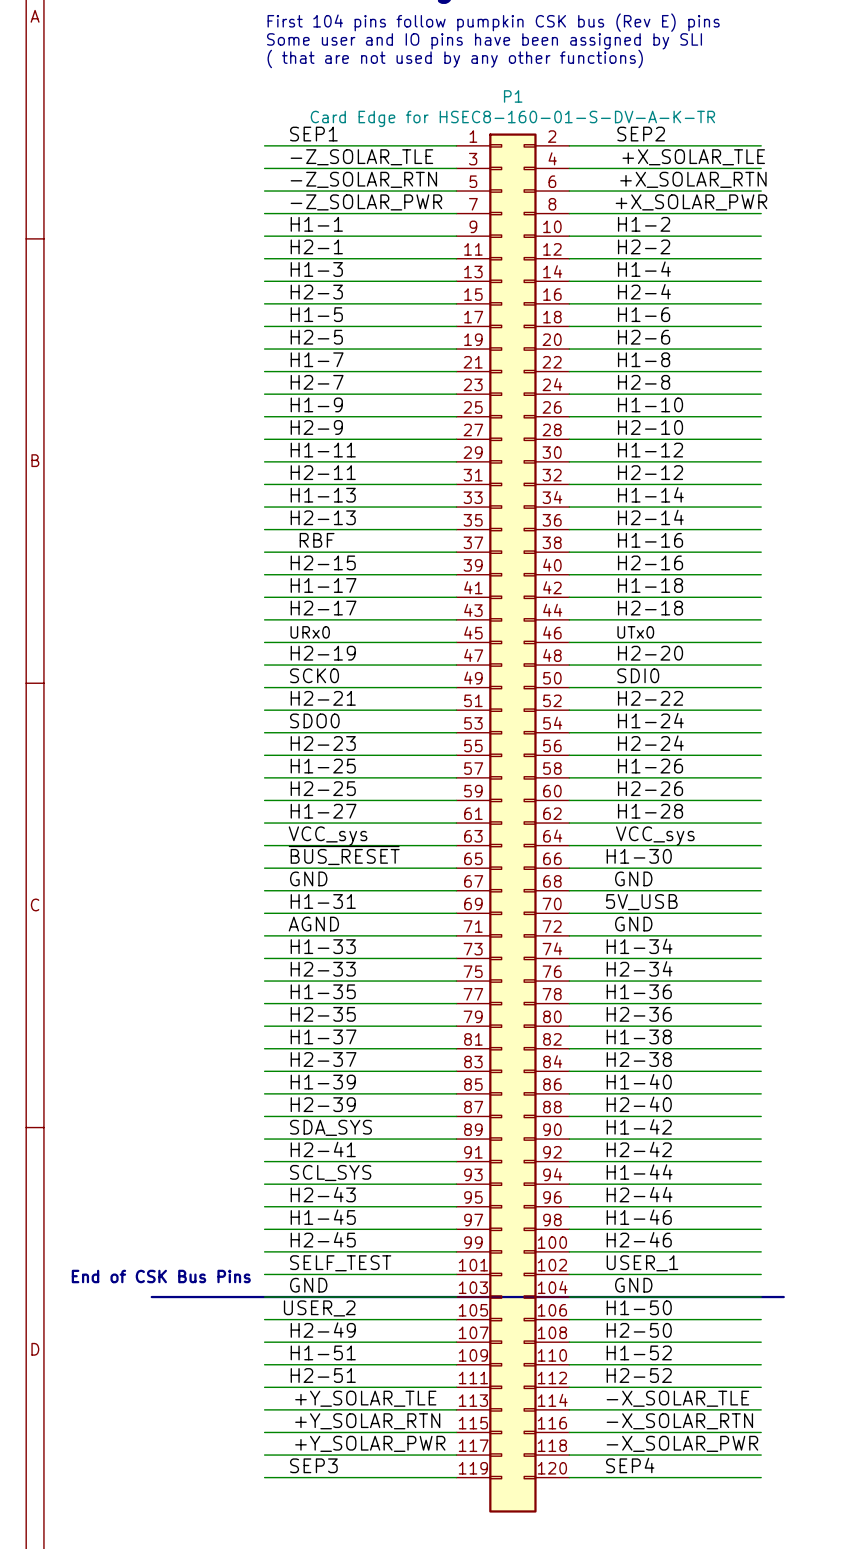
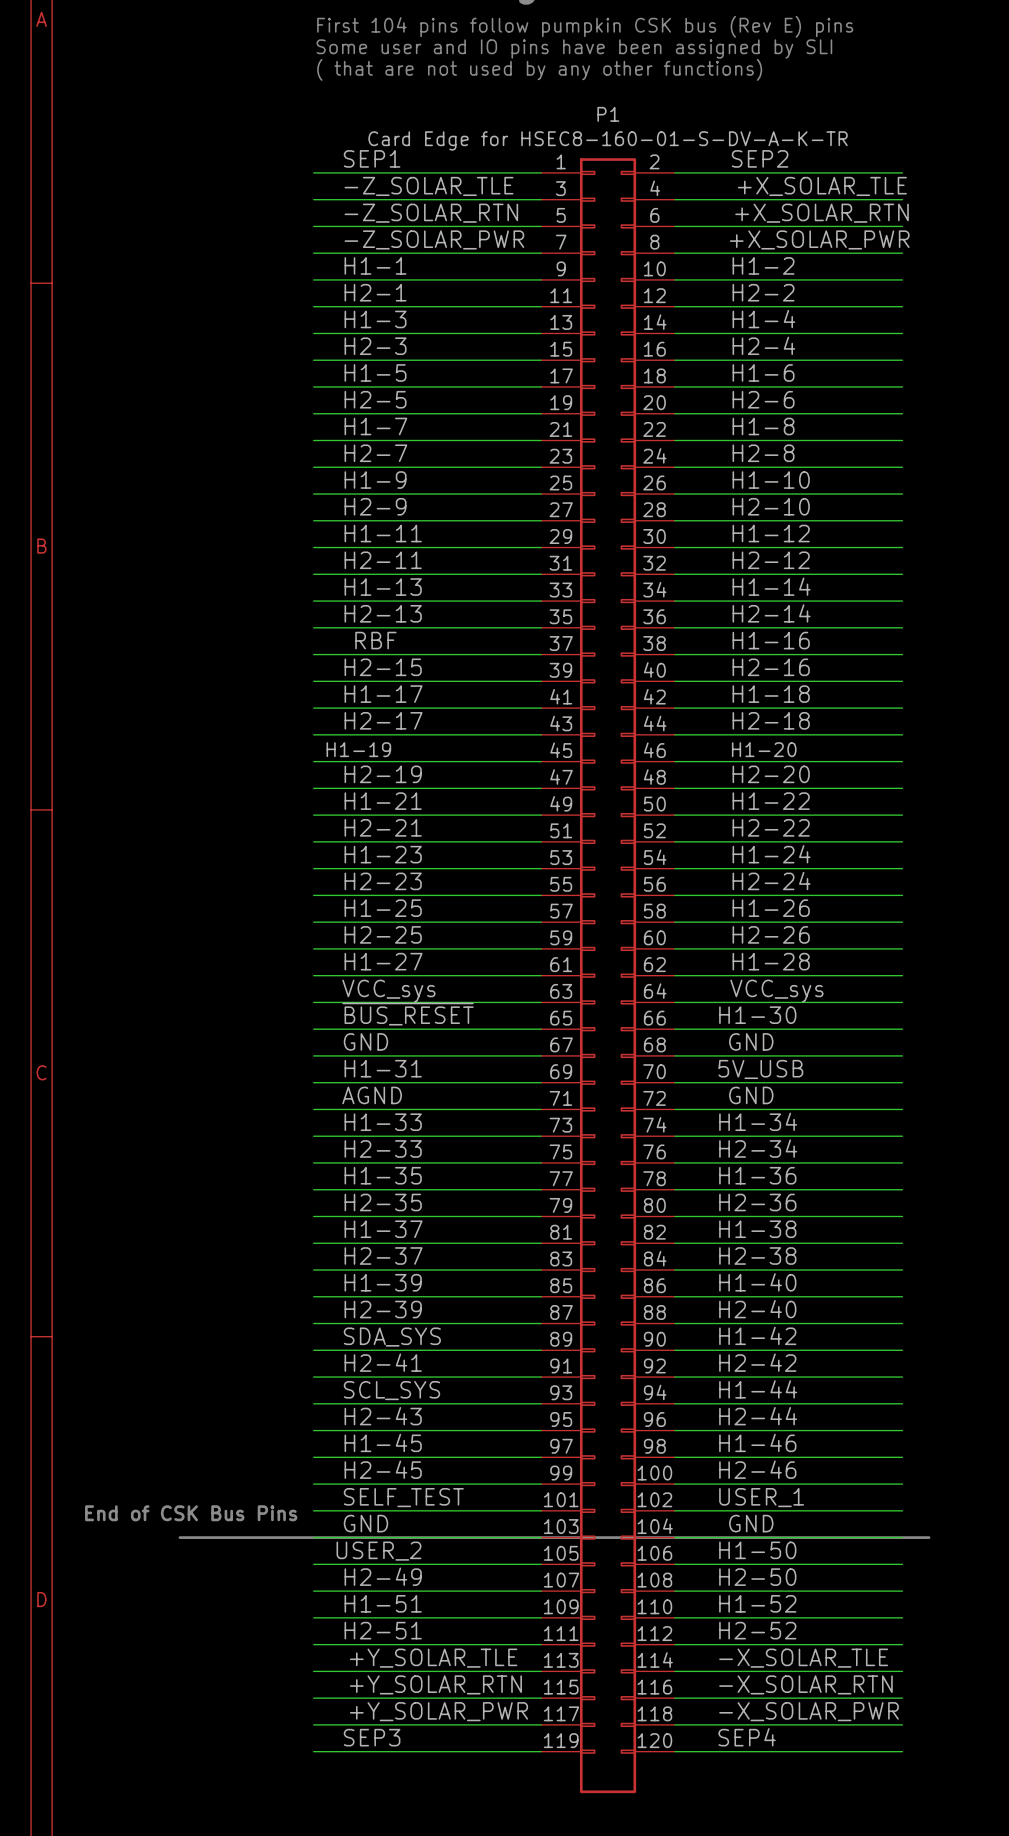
label: URx0 (310, 632) -> H1-19 (358, 749)
label: UTx0 (635, 632) -> H1-20 (764, 749)
label: SCK0 (314, 675) -> H1-21 (383, 801)
label: SDI0 (638, 675) -> H1-22 (771, 801)
label: SDO0 (314, 720) -> H1-23 (383, 854)

